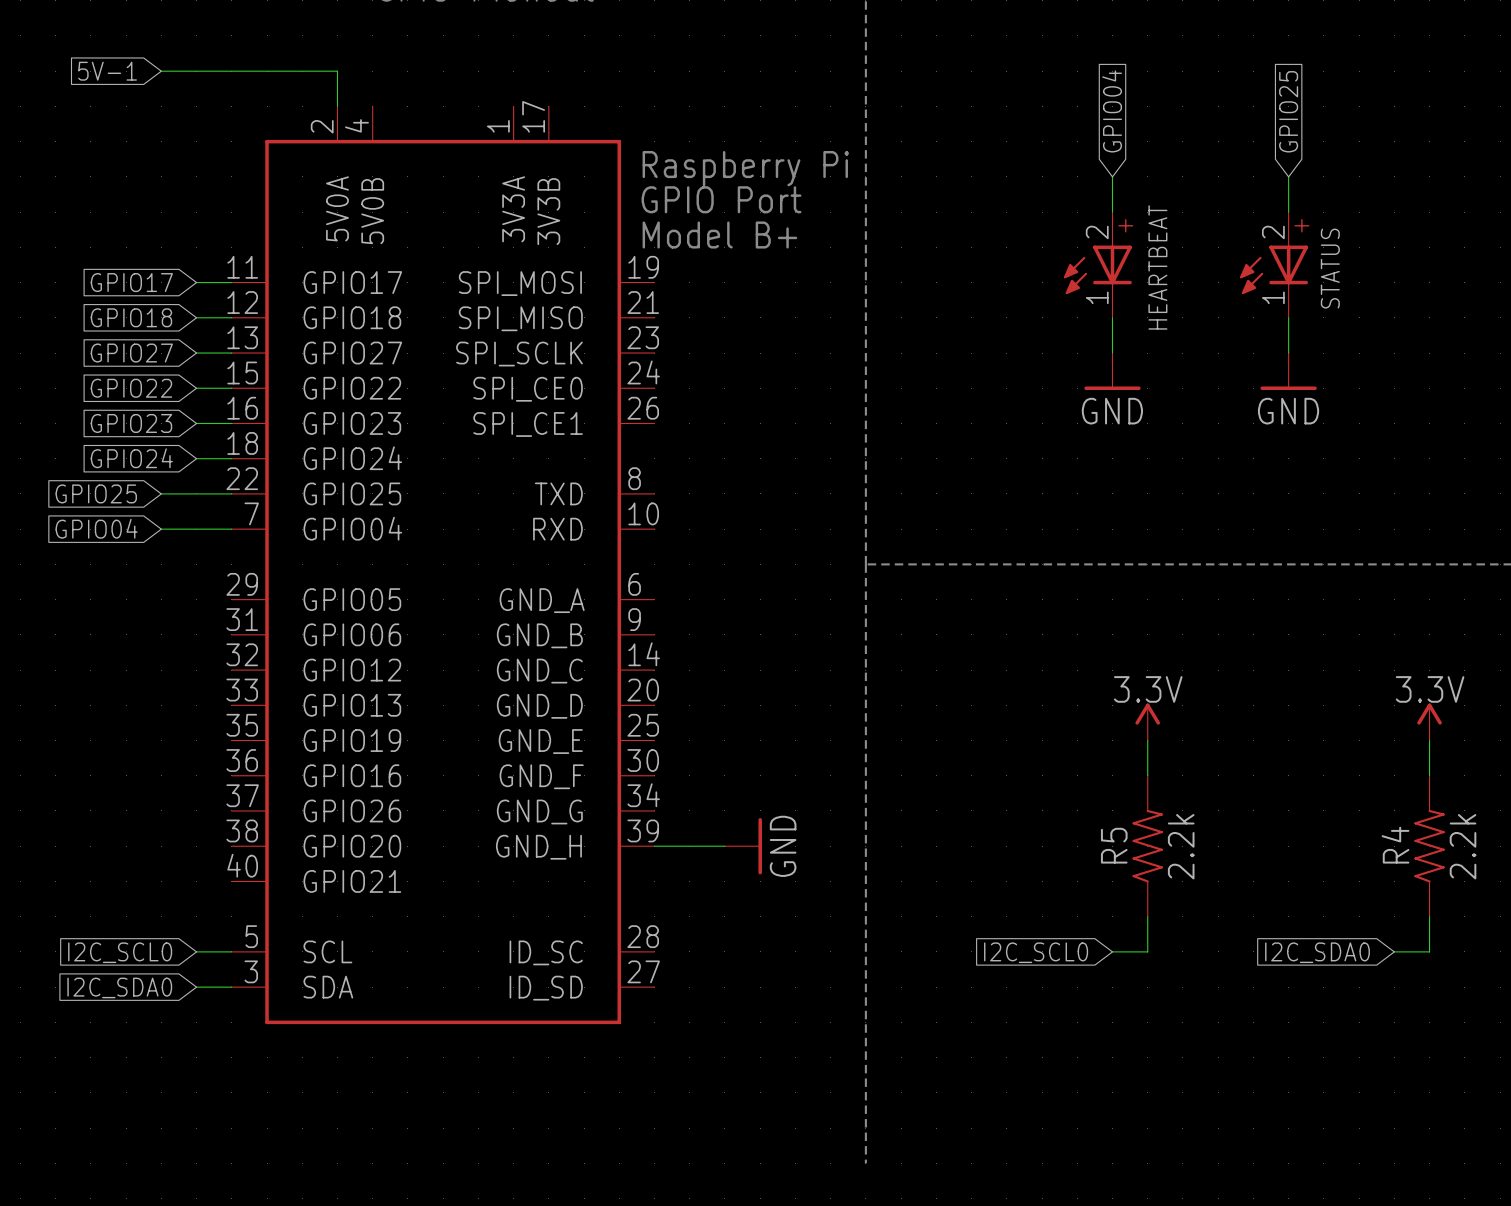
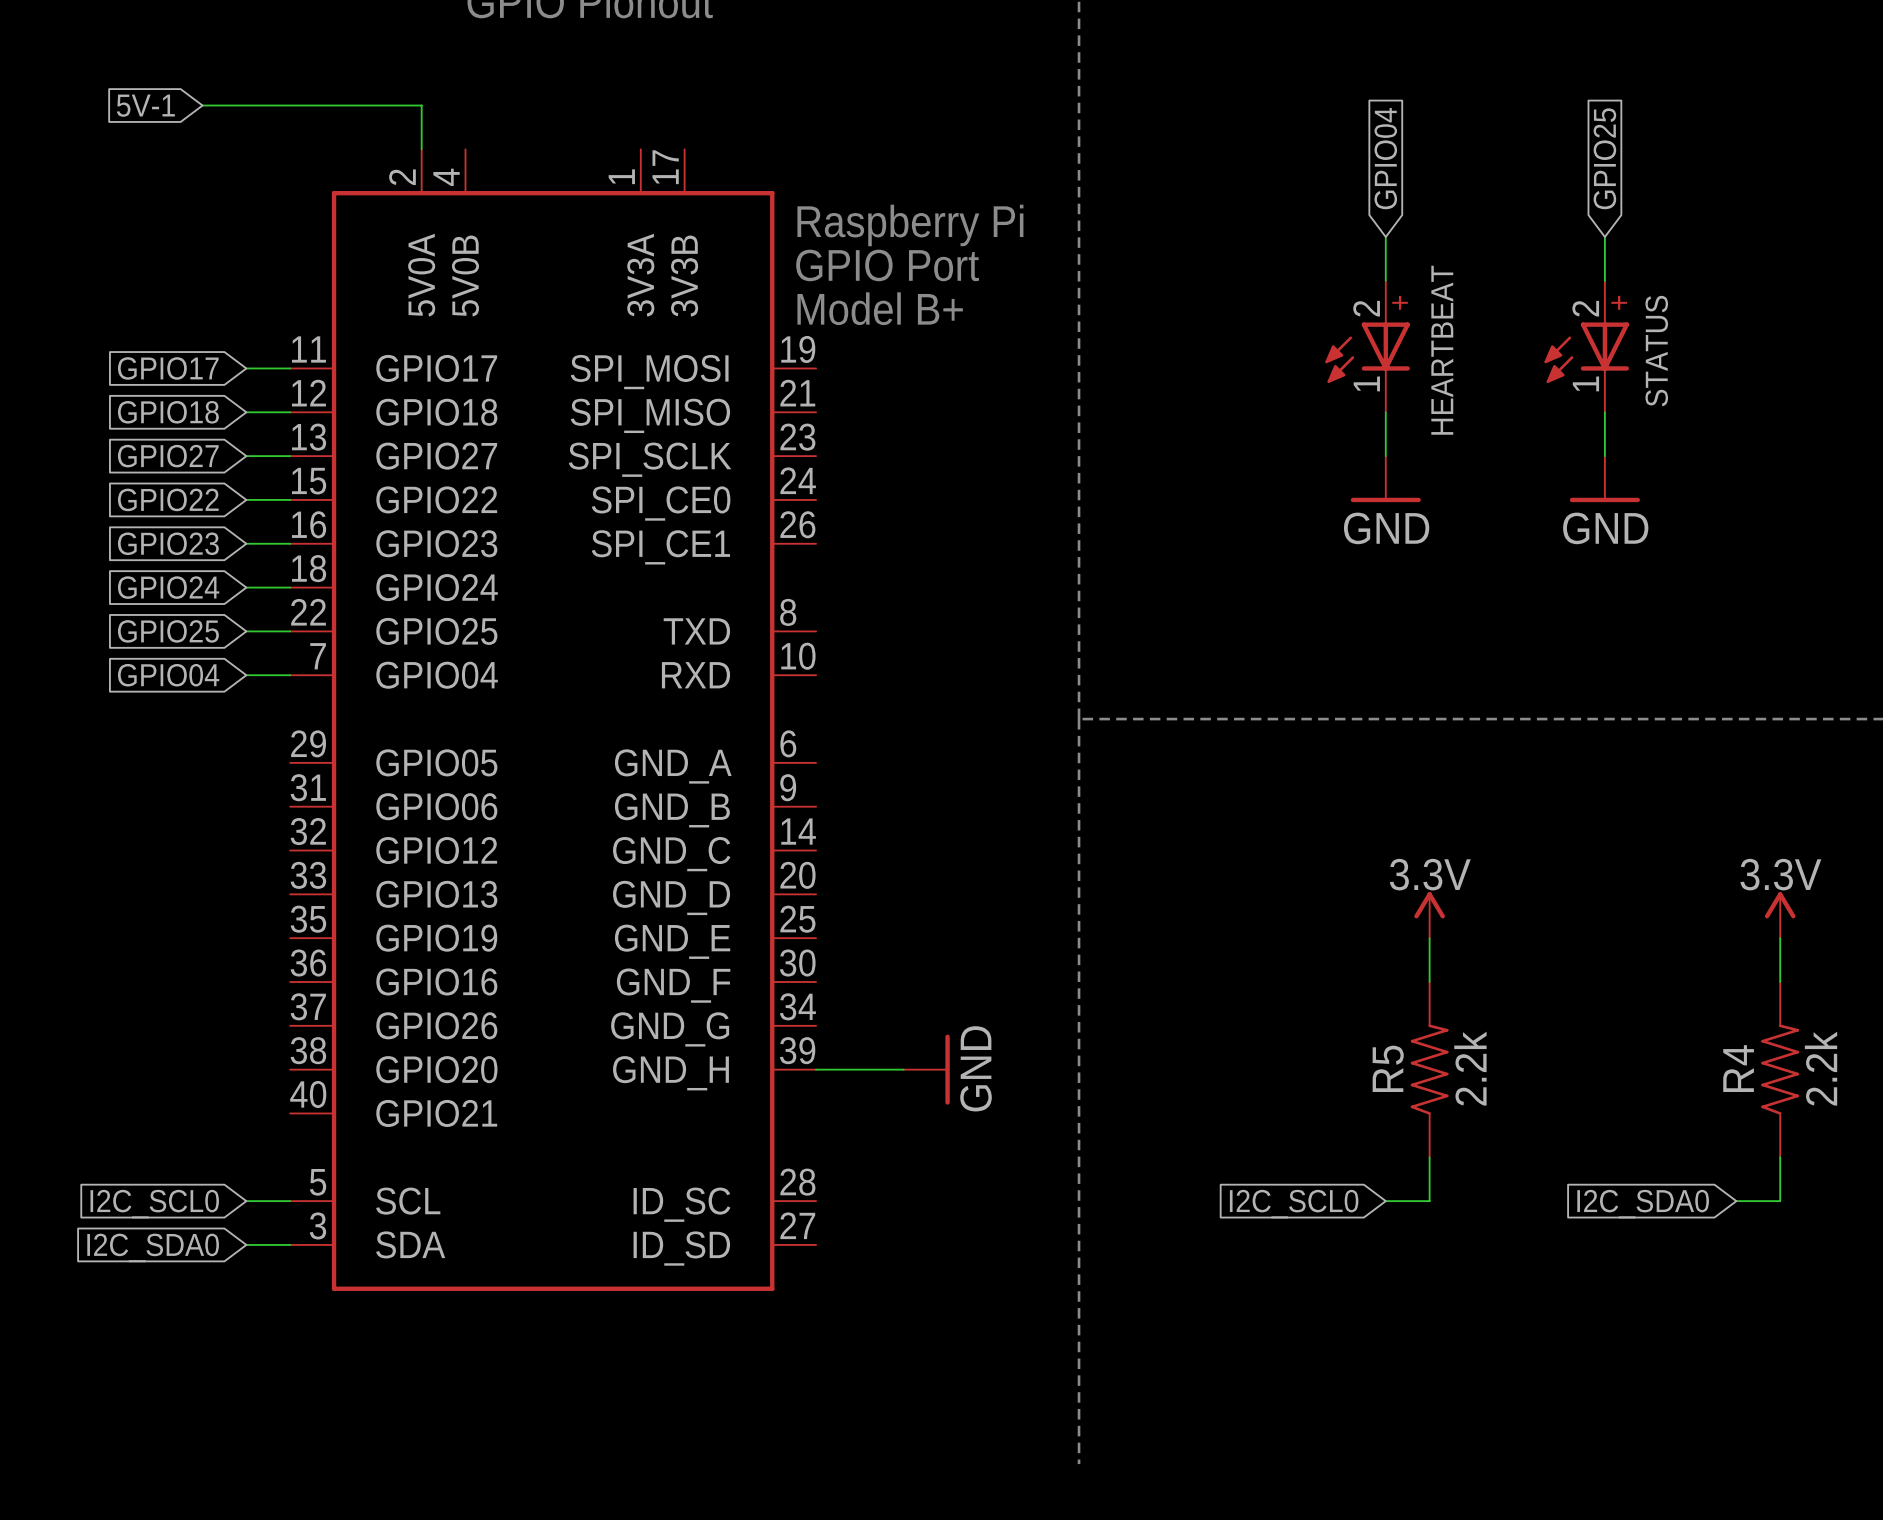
global label position: GPIO25 (96, 493) -> GPIO25 (168, 631)
wire: (161, 493) (196, 493) -> none
global label position: GPIO04 (96, 528) -> GPIO04 (168, 675)
wire: (161, 529) (196, 529) -> none

